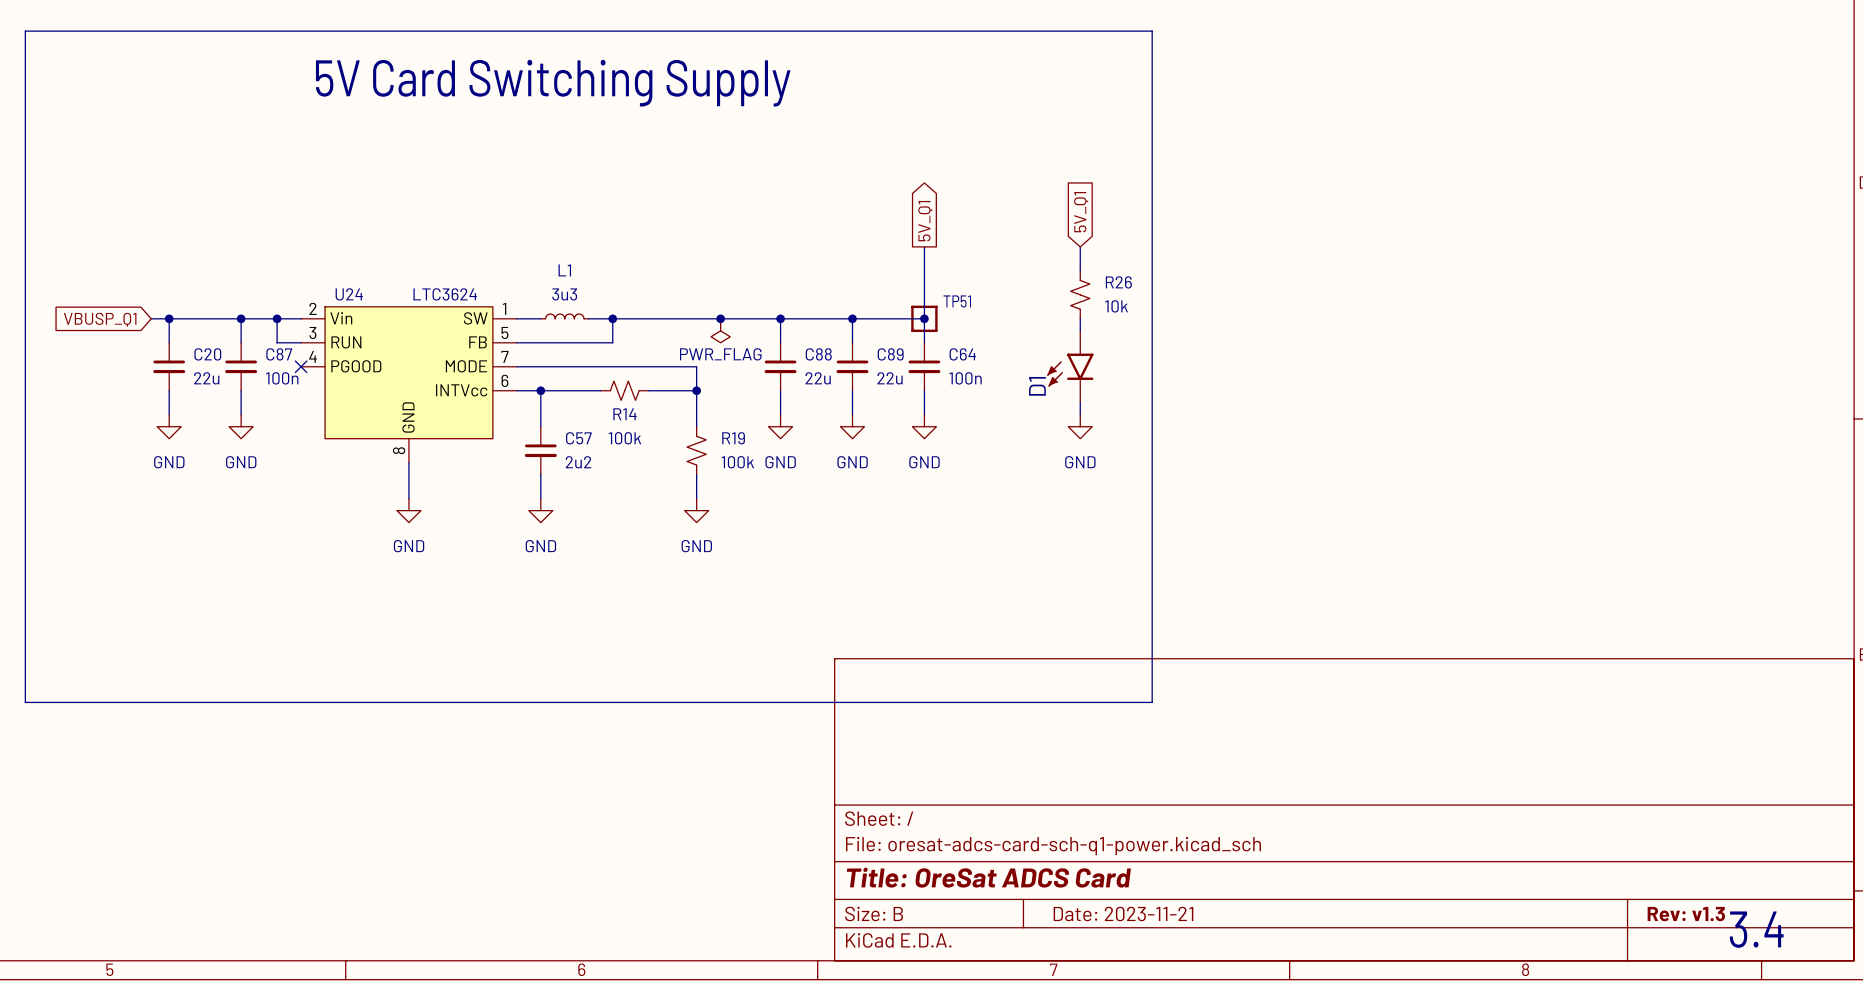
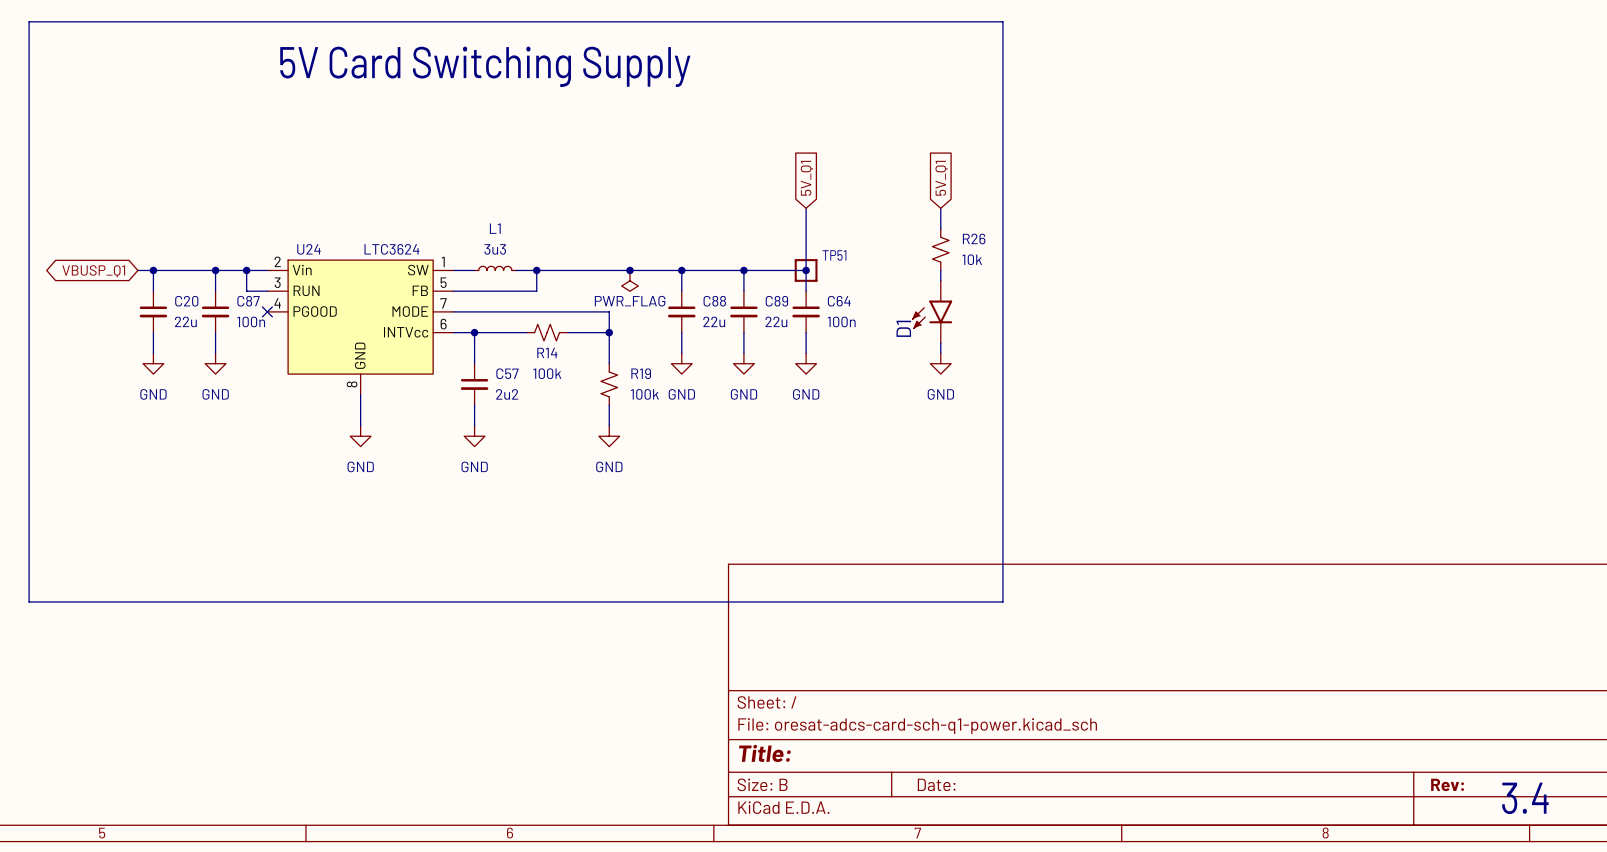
global label shape: output (925, 221) -> input (806, 178)
global label shape: input (100, 319) -> bidirectional (93, 271)
title block: Title: OreSat ADCS Card (988, 877) -> Title: (764, 753)
title block: Date: 2023-11-21 (1123, 914) -> Date: (936, 784)
title block: Rev: v1.3 (1686, 914) -> Rev: (1447, 784)

